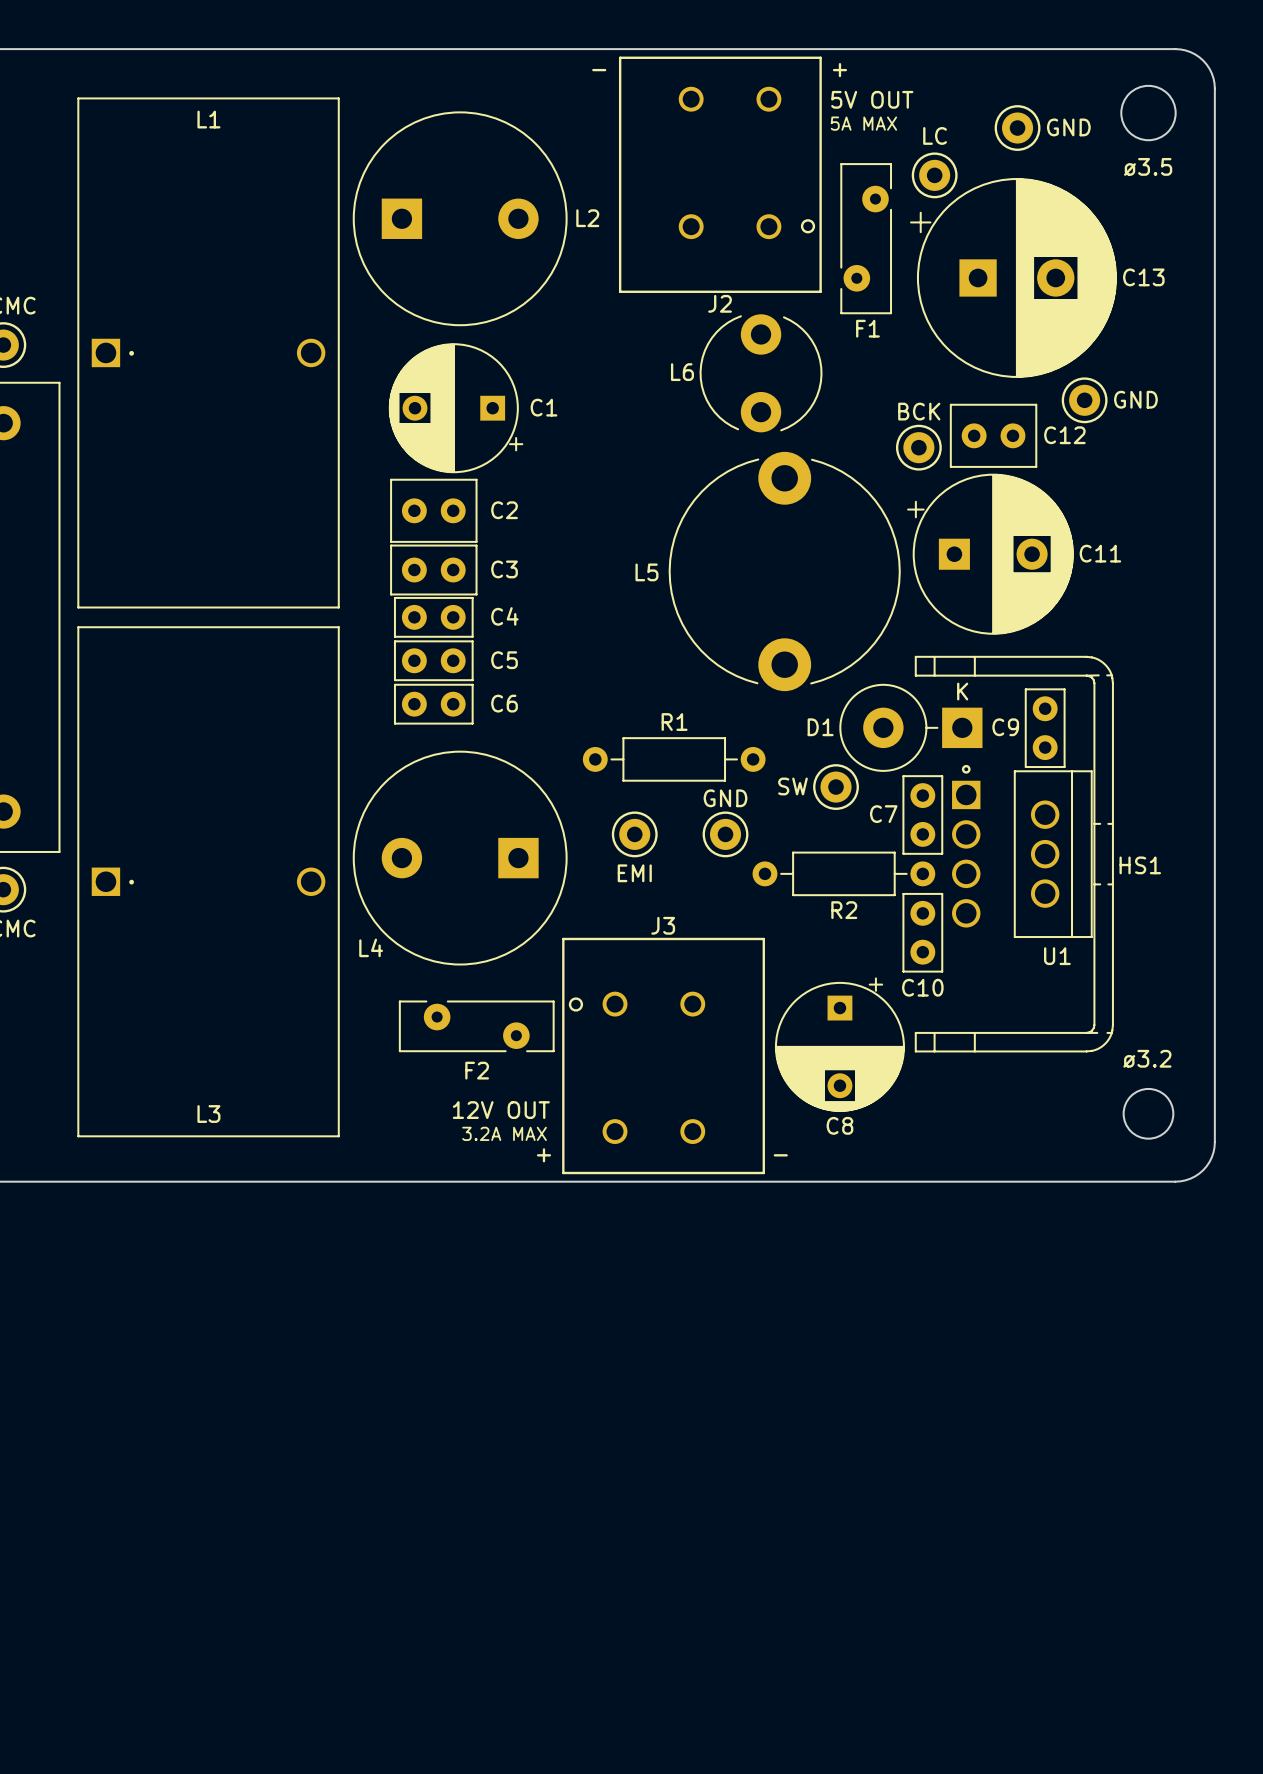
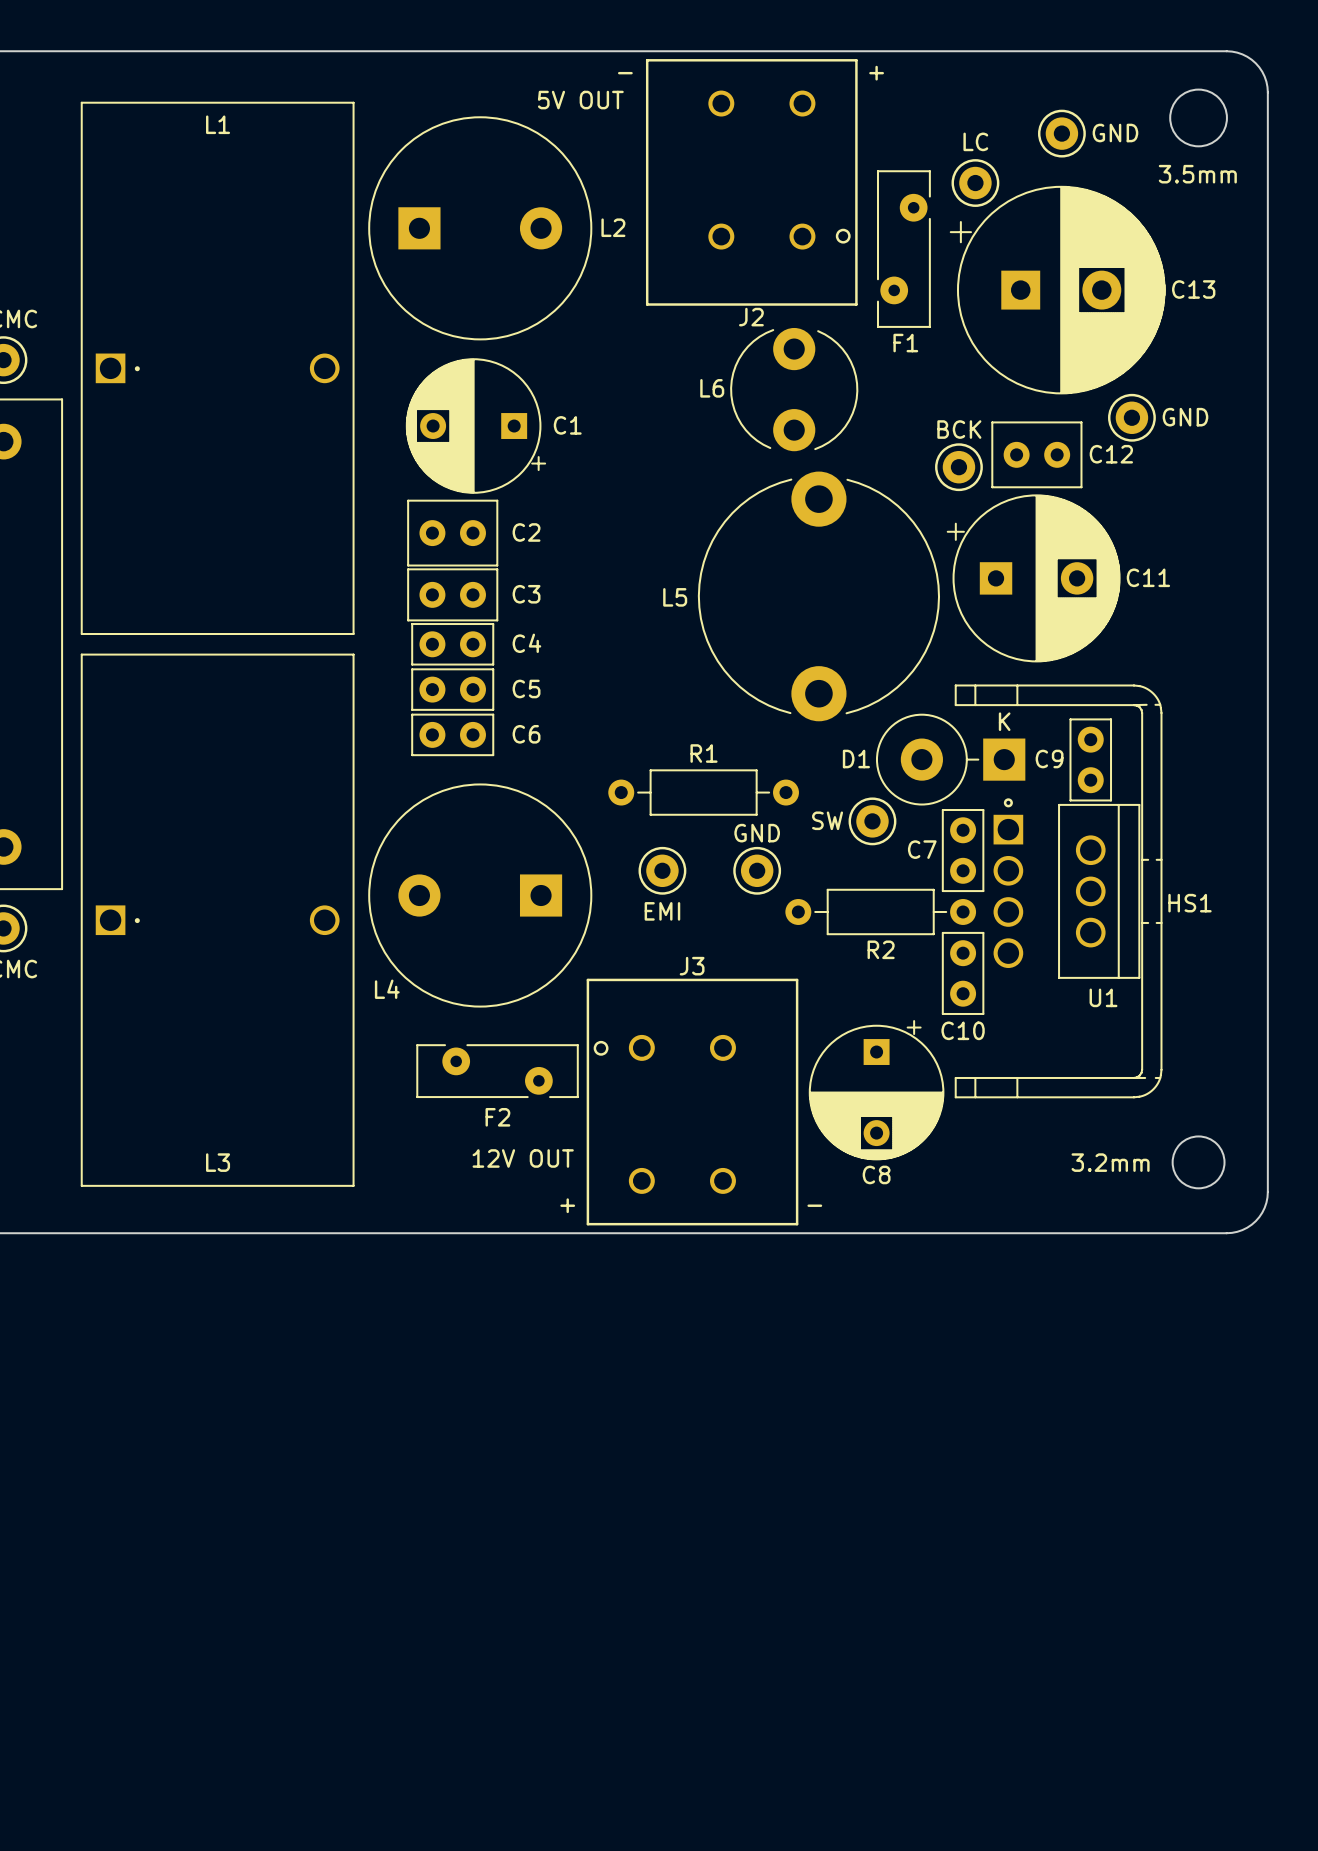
J2 value position: 5V OUT (872, 99) -> 5V OUT (580, 100)
J2 text: 5A MAX (863, 123) -> none
part value: ø3.5 (1148, 166) -> 3.5mm (1197, 174)
part value: ø3.2 (1147, 1058) -> 3.2mm (1110, 1162)
J3 text: 3.2A MAX (504, 1133) -> none

